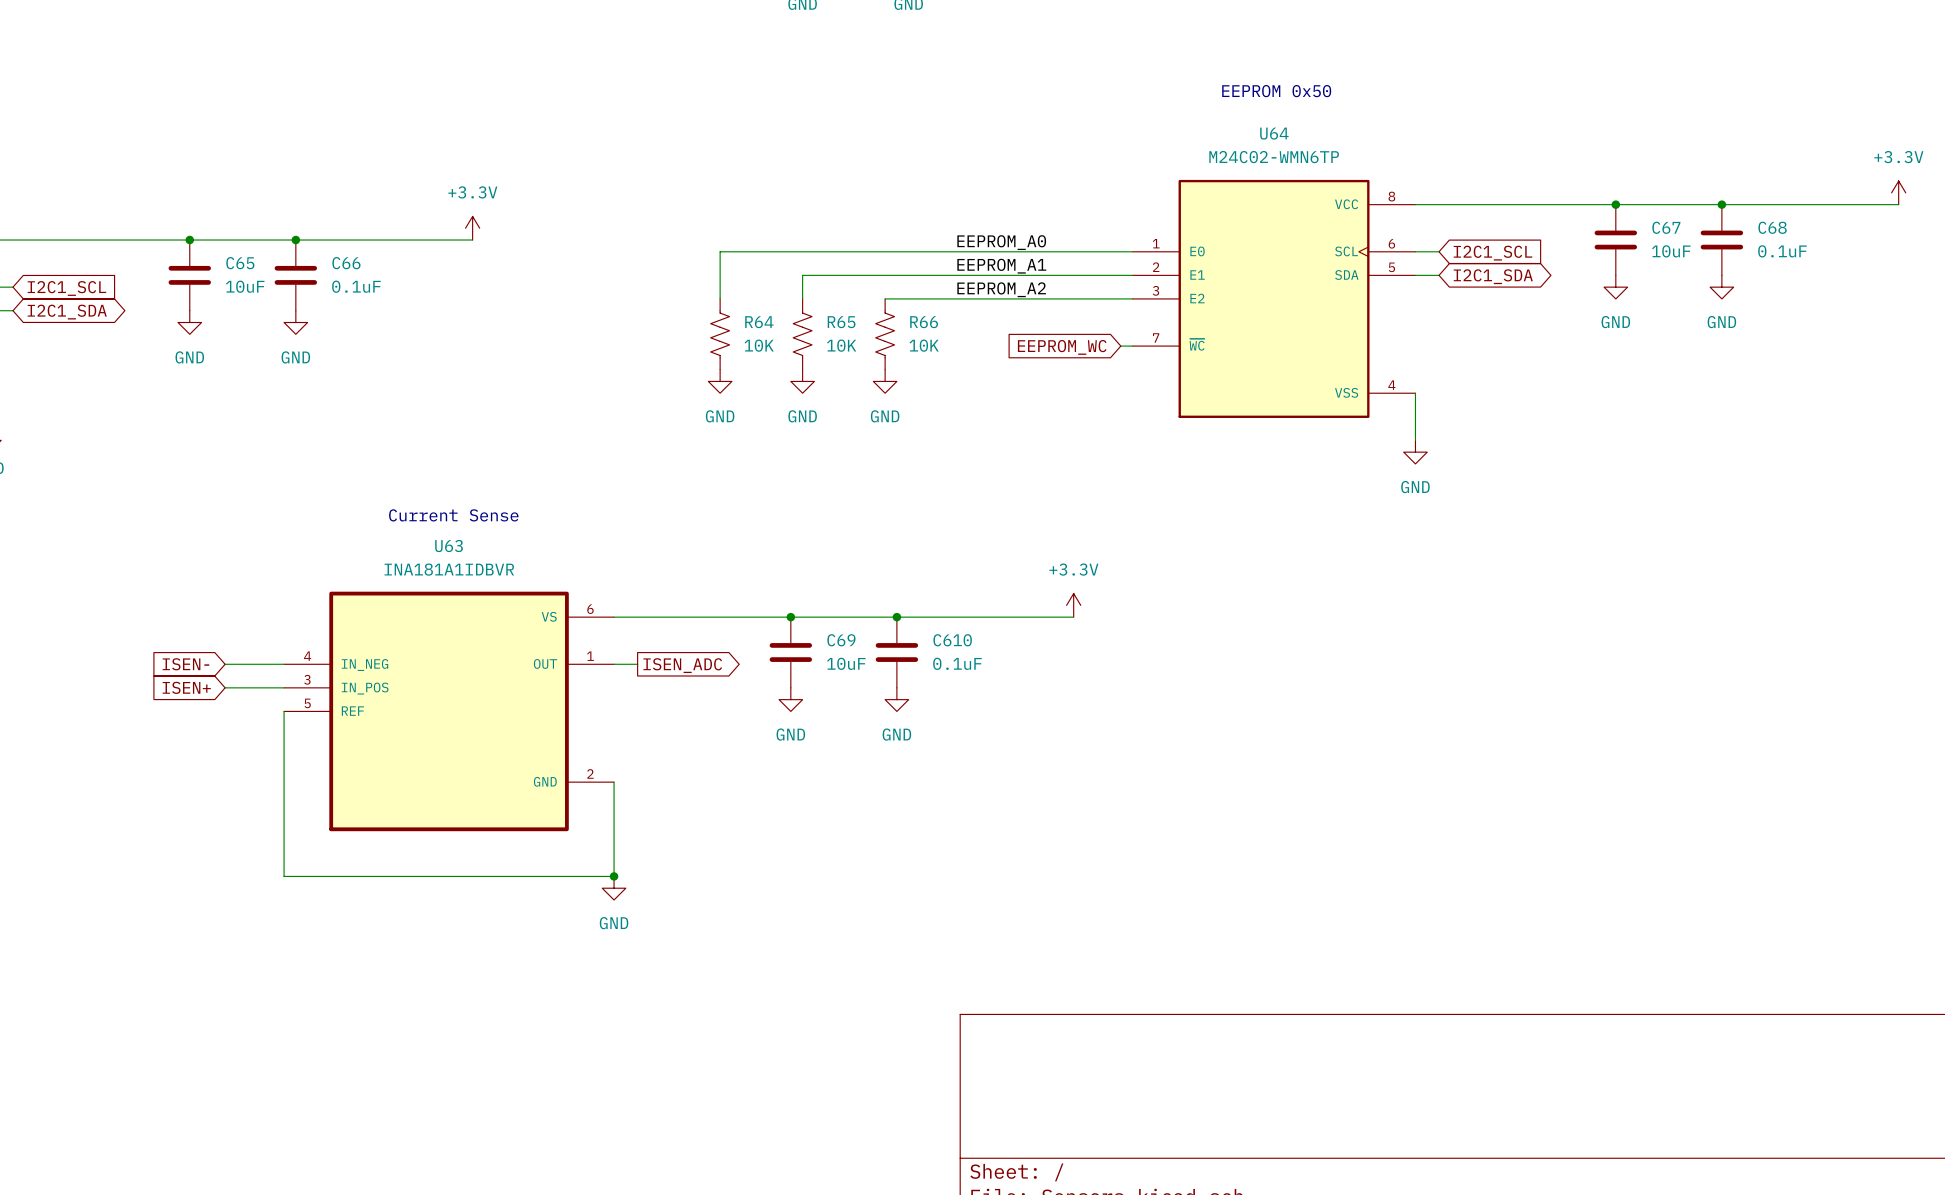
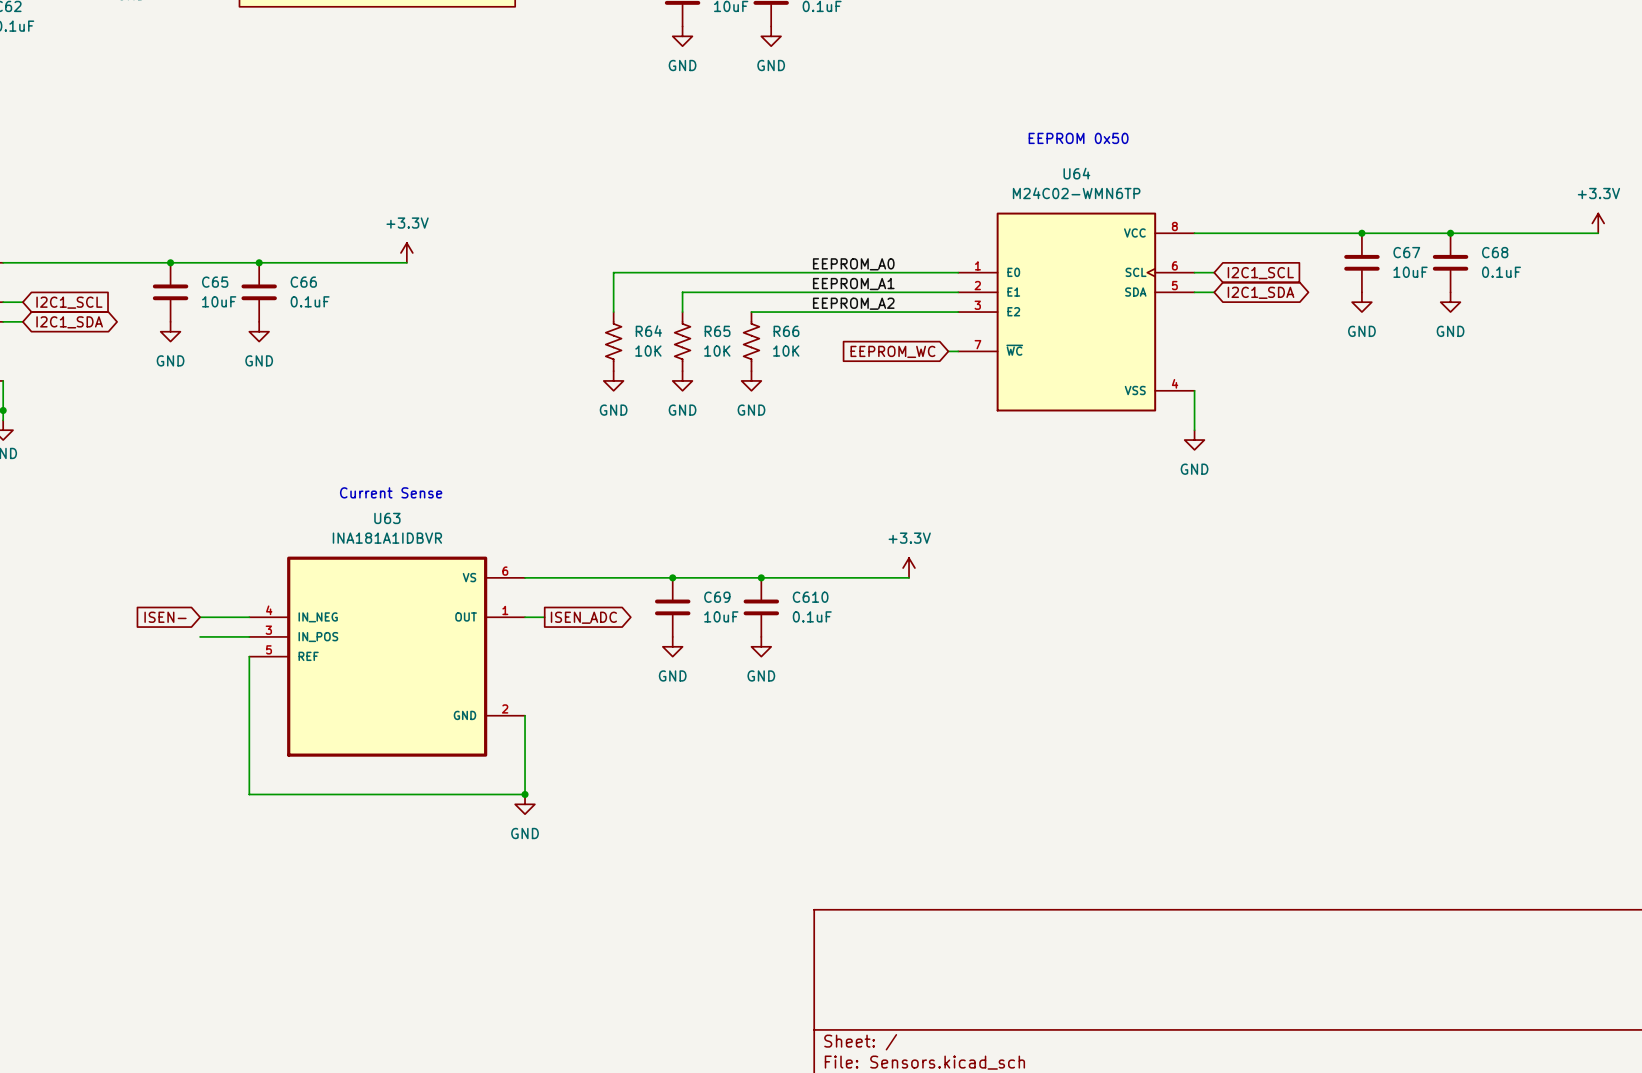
global label: ISEN+ (186, 687) -> none

